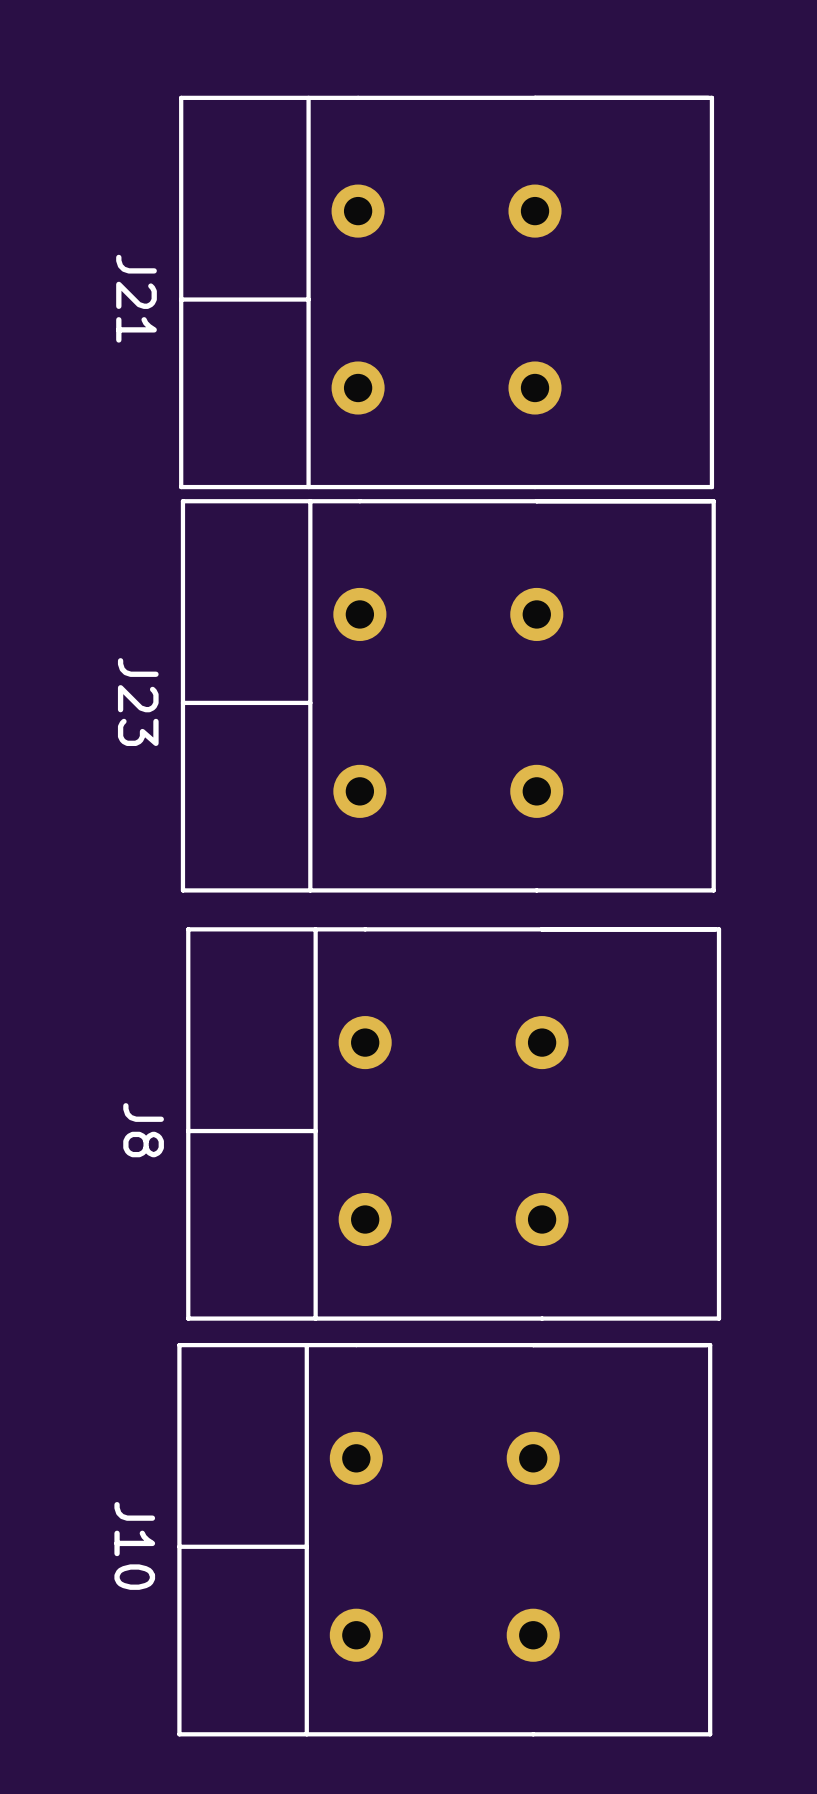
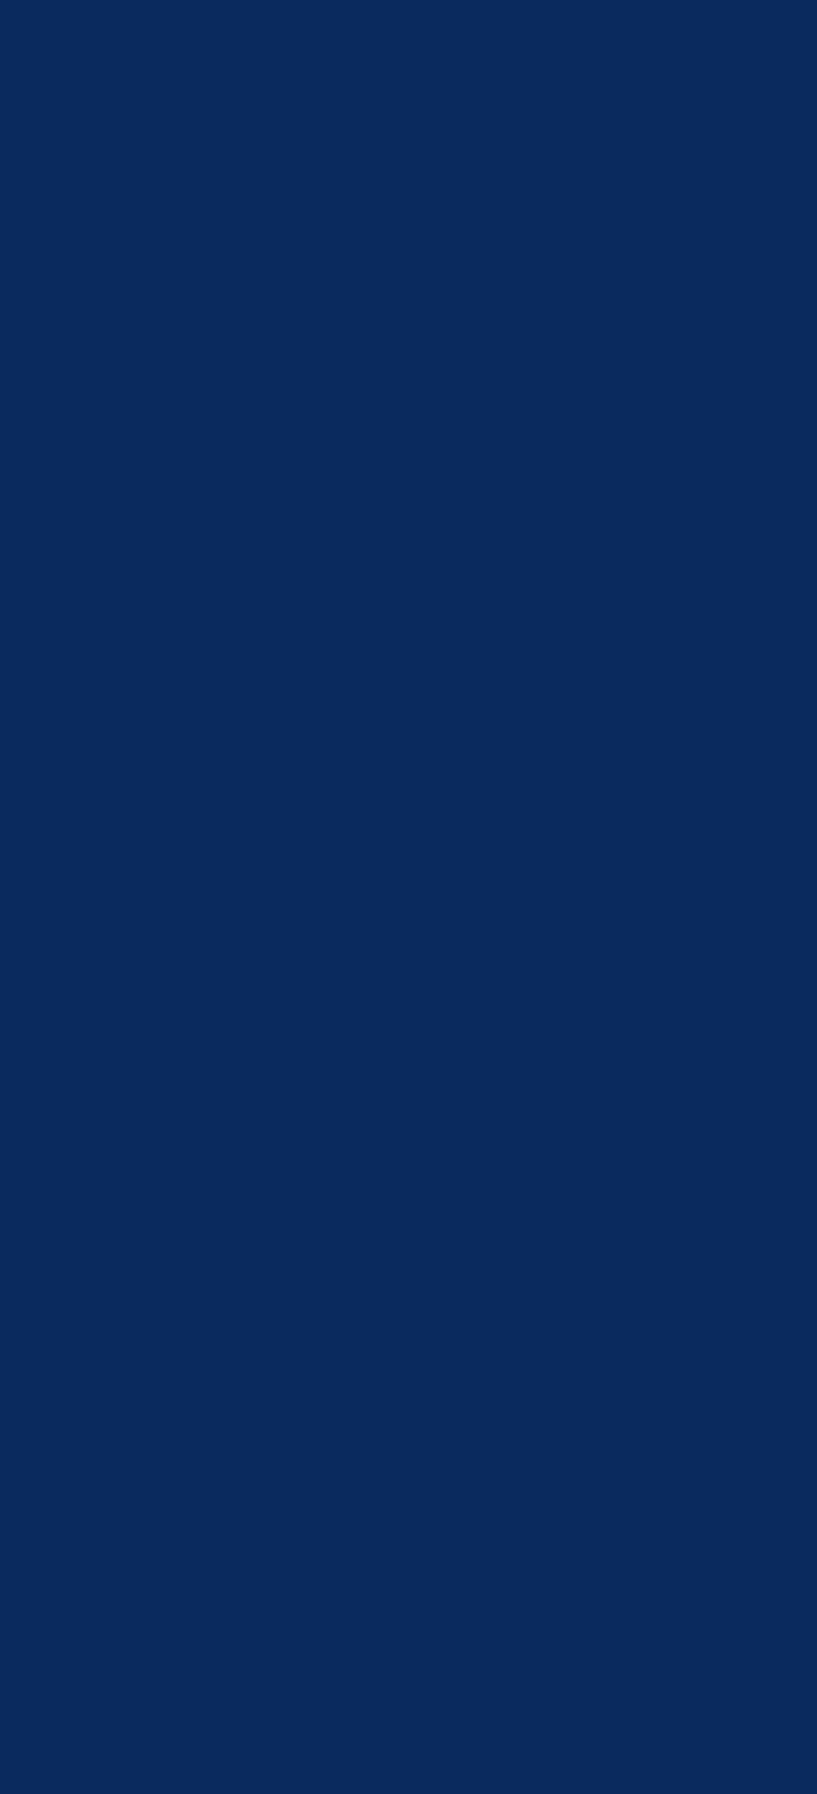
J21: (446, 292) -> none
J23: (448, 695) -> none
J8: (453, 1123) -> none
J10: (444, 1539) -> none

